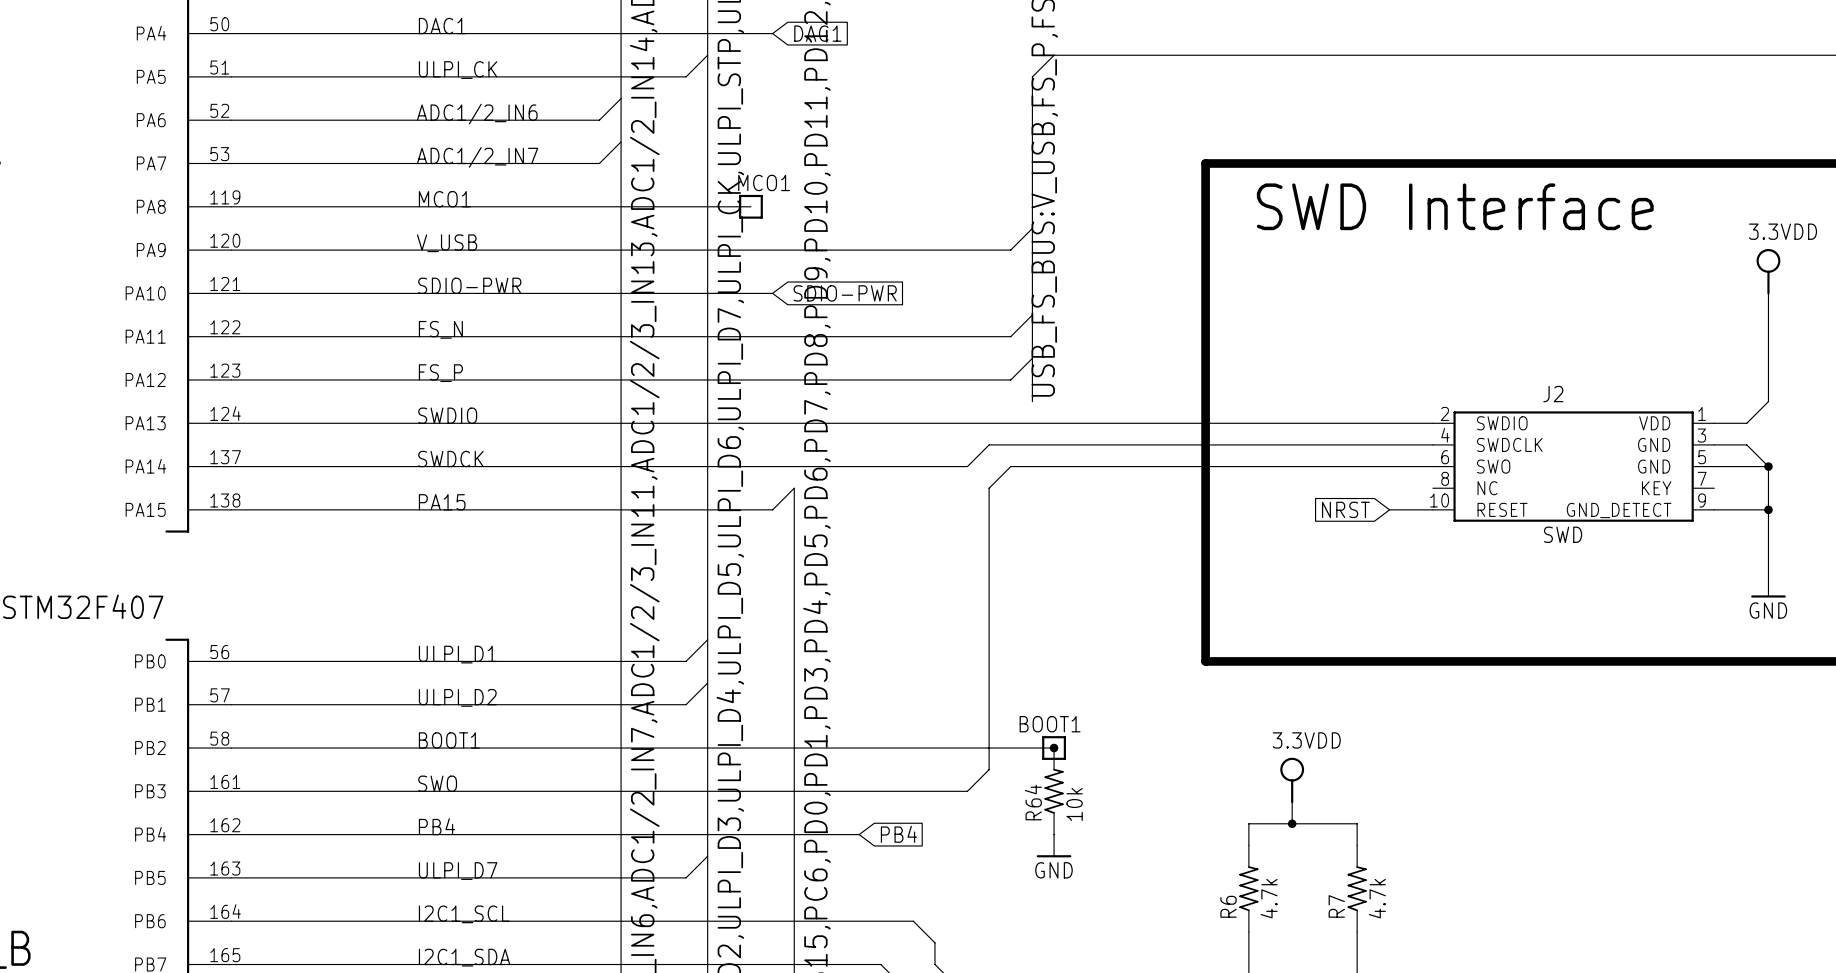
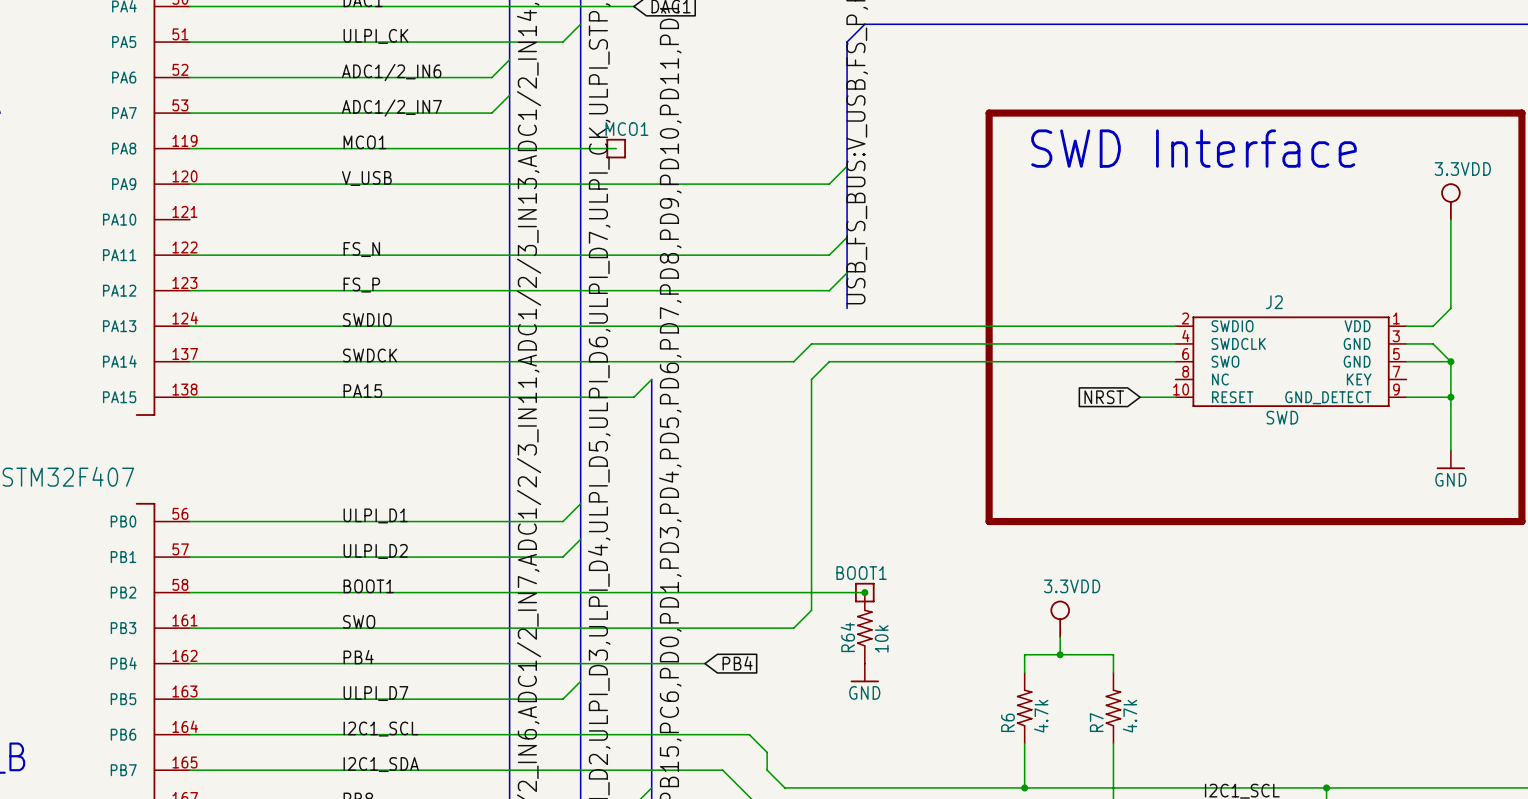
label: SDIO-PWR (469, 285) -> none
wire: (231, 293) (772, 293) -> none
global label: SDIO-PWR (845, 293) -> none

